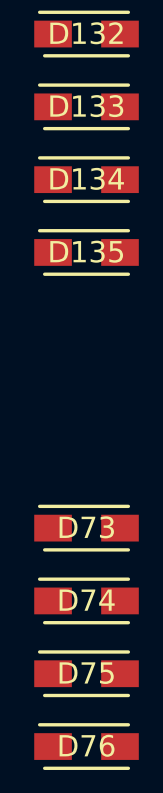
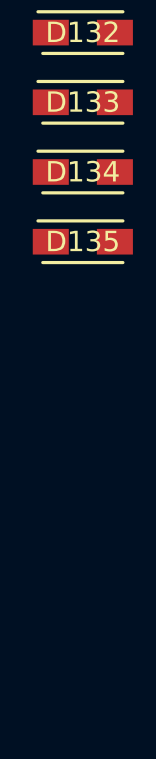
D73: (86, 528) -> none
D74: (86, 600) -> none
D75: (86, 673) -> none
D76: (86, 746) -> none

